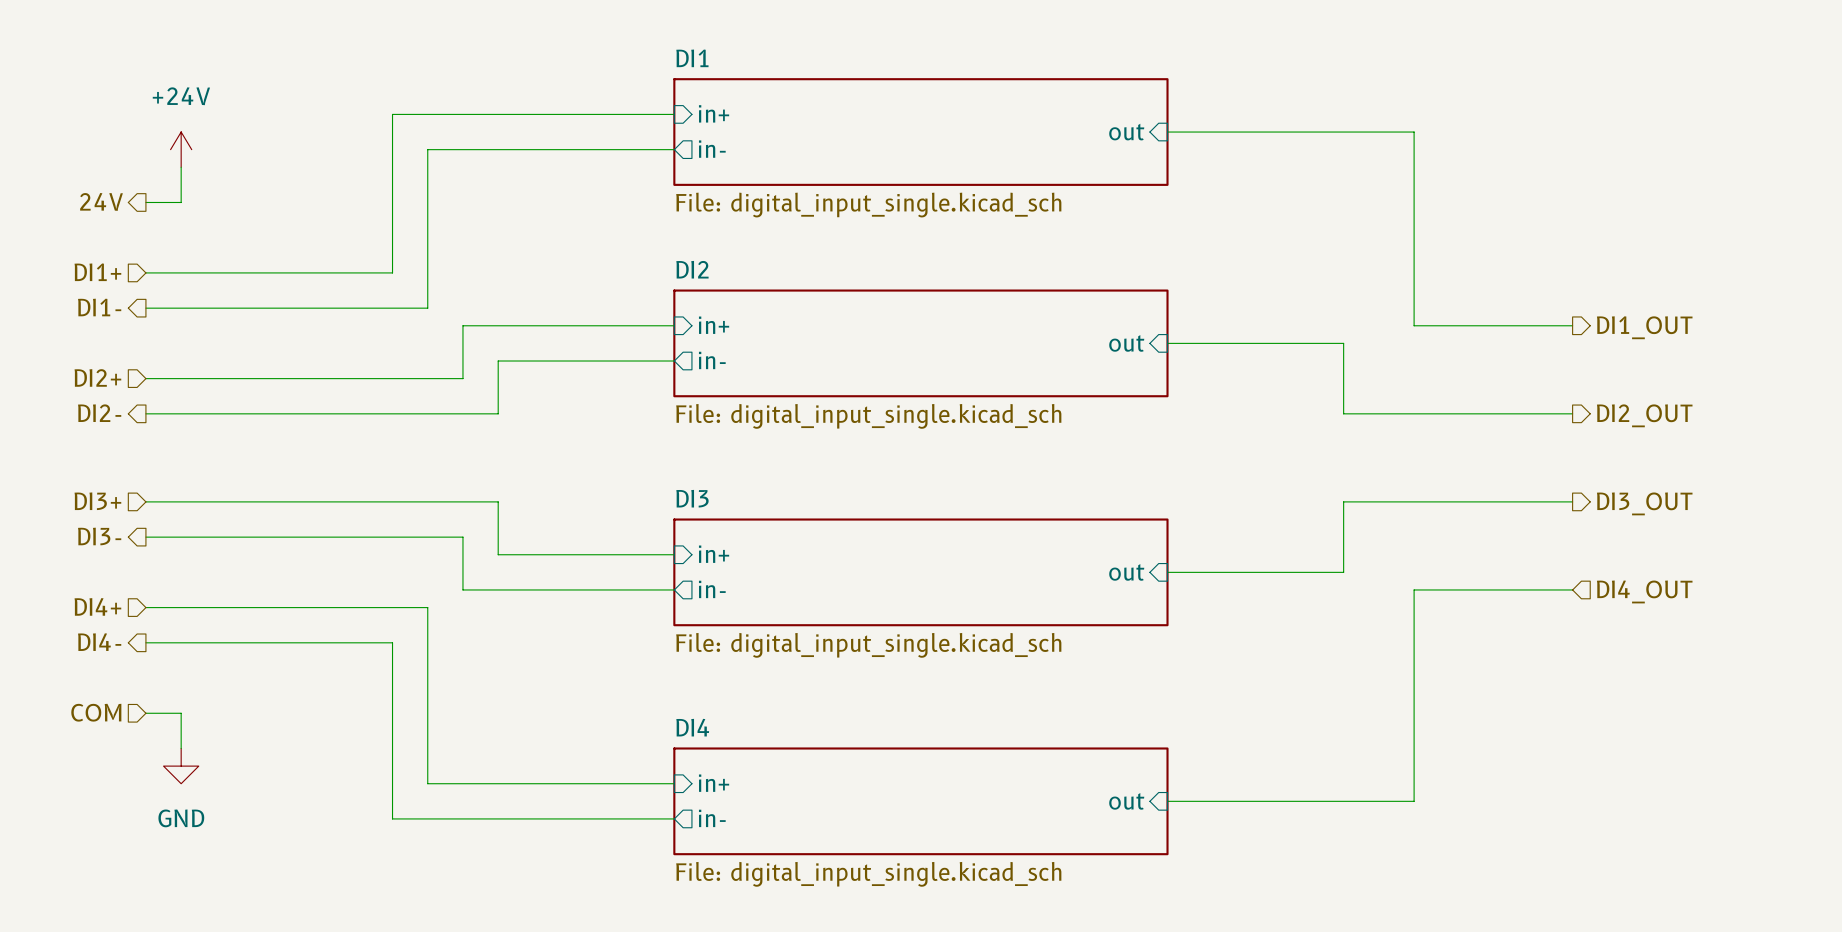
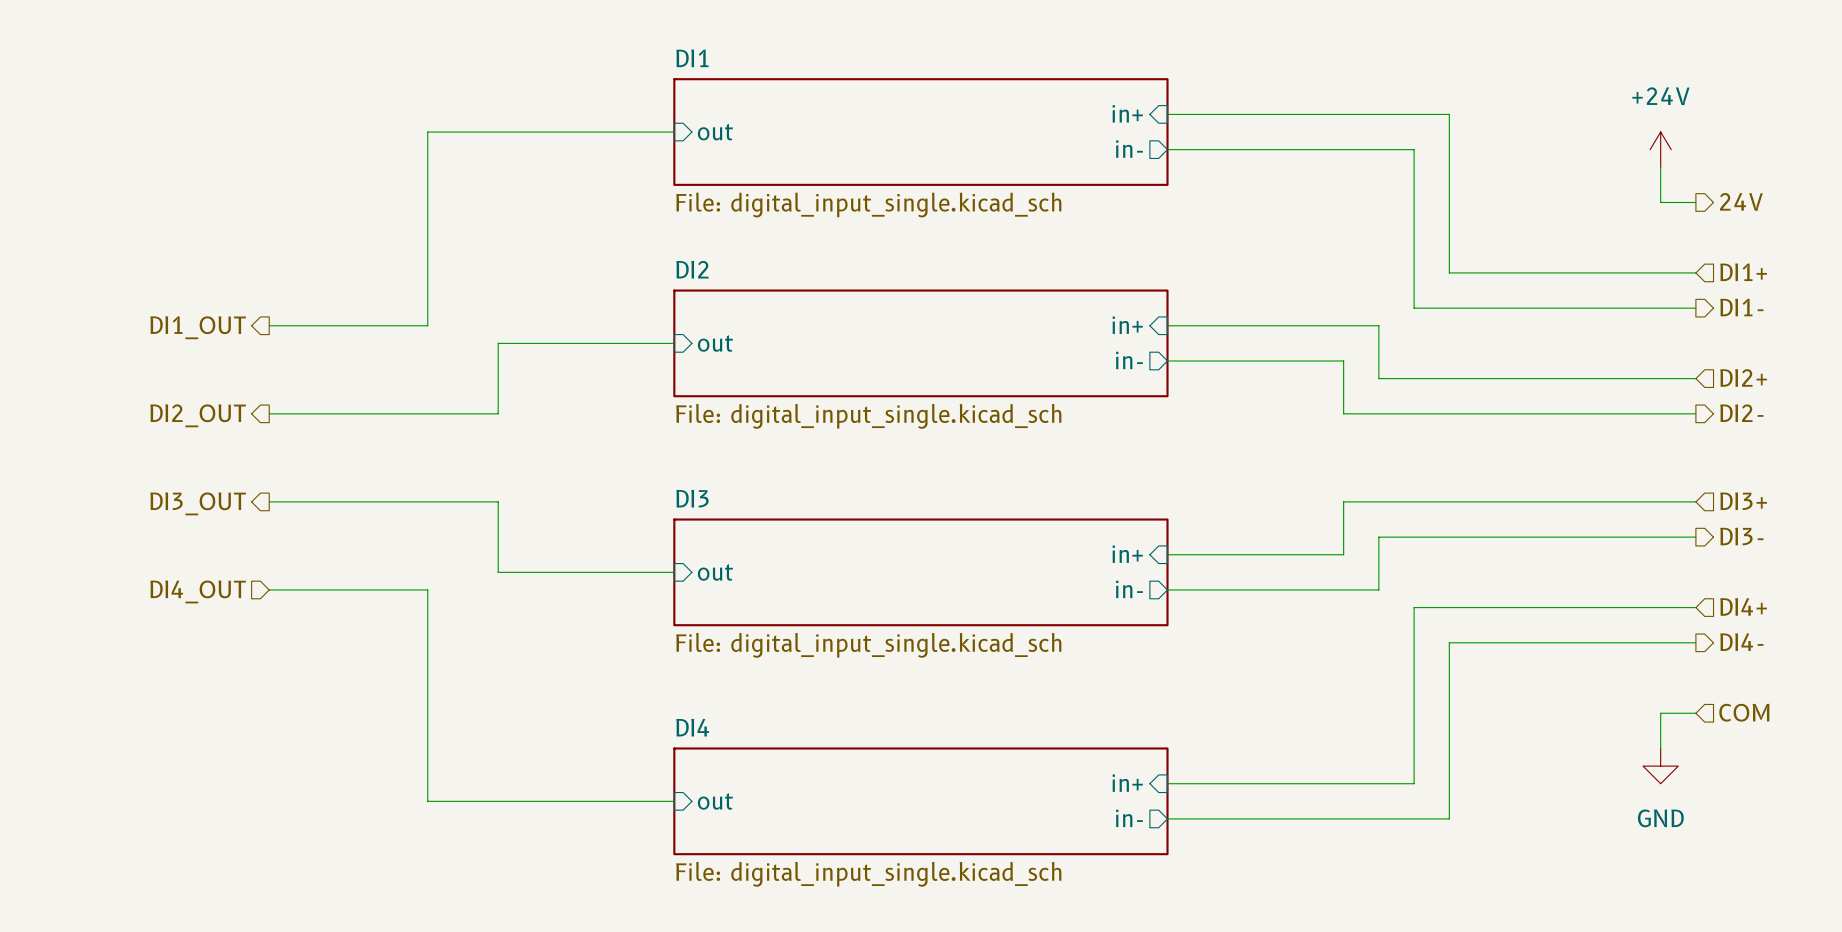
sheet pin: in+ (714, 113) -> none
sheet pin: none -> in+ (1127, 113)
wire: (674, 114) (392, 114) (392, 272) (145, 272) -> none
wire: none -> (1167, 114) (1449, 114) (1449, 272) (1695, 272)
sheet pin: none -> out (715, 132)
sheet pin: out (1126, 132) -> none
wire: (1167, 132) (1414, 132) (1414, 149) -> (1167, 149) (1414, 149)
power symbol: +24V (181, 149) -> none
wire: (427, 149) (674, 149) -> (427, 149) (427, 132) (674, 132)
sheet pin: in- (712, 149) -> none
sheet pin: none -> in- (1129, 149)
power symbol: none -> +24V (1660, 149)
wire: (181, 167) (181, 202) (145, 202) -> none
wire: none -> (1660, 167) (1660, 202) (1695, 202)
hierarchical label: 24V (101, 201) -> none
hierarchical label: none -> 24V (1741, 201)
hierarchical label: DI1+ (97, 272) -> none
hierarchical label: none -> DI1+ (1743, 272)
hierarchical label: DI1- (99, 307) -> none
hierarchical label: none -> DI1- (1741, 307)
wire: (145, 308) (427, 308) -> (269, 325) (427, 325) (427, 308)
wire: (1414, 308) (1414, 325) (1572, 325) -> (1414, 308) (1695, 308)
wire: (674, 325) (462, 325) (462, 378) (145, 378) -> none
sheet pin: in+ (714, 325) -> none
sheet pin: none -> in+ (1127, 325)
wire: none -> (1167, 325) (1378, 325) (1378, 378) (1695, 378)
hierarchical label: none -> DI1_OUT (198, 327)
hierarchical label: DI1_OUT (1644, 327) -> none
sheet pin: none -> out (715, 343)
sheet pin: out (1126, 343) -> none
wire: (1167, 343) (1343, 343) (1343, 361) -> (1167, 361) (1343, 361)
sheet pin: in- (712, 360) -> none
sheet pin: none -> in- (1129, 360)
wire: (498, 361) (674, 361) -> (498, 361) (498, 343) (674, 343)
hierarchical label: DI2+ (97, 377) -> none
hierarchical label: none -> DI2+ (1743, 377)
hierarchical label: DI2- (99, 413) -> none
wire: (145, 413) (269, 413) -> none
wire: none -> (1572, 413) (1695, 413)
hierarchical label: none -> DI2- (1741, 413)
hierarchical label: none -> DI2_OUT (198, 415)
hierarchical label: DI2_OUT (1644, 415) -> none
hierarchical label: DI3+ (97, 501) -> none
wire: (145, 501) (269, 501) -> none
wire: none -> (1572, 501) (1695, 501)
hierarchical label: none -> DI3+ (1743, 501)
hierarchical label: none -> DI3_OUT (198, 503)
hierarchical label: DI3_OUT (1644, 503) -> none
hierarchical label: DI3- (99, 536) -> none
hierarchical label: none -> DI3- (1741, 536)
wire: (145, 537) (462, 537) (462, 589) (674, 589) -> none
wire: none -> (1695, 537) (1378, 537) (1378, 589) (1167, 589)
wire: (498, 554) (674, 554) -> (498, 554) (498, 572) (674, 572)
sheet pin: in+ (714, 554) -> none
sheet pin: none -> in+ (1127, 554)
wire: (1343, 554) (1343, 572) (1167, 572) -> (1343, 554) (1167, 554)
sheet pin: none -> out (715, 572)
sheet pin: out (1126, 572) -> none
sheet pin: in- (712, 589) -> none
sheet pin: none -> in- (1129, 589)
wire: (1572, 589) (1414, 589) (1414, 607) -> (1695, 607) (1414, 607)
hierarchical label: none -> DI4_OUT (198, 591)
hierarchical label: DI4_OUT (1644, 591) -> none
hierarchical label: DI4+ (97, 606) -> none
hierarchical label: none -> DI4+ (1743, 606)
wire: (145, 607) (427, 607) -> (269, 589) (427, 589) (427, 607)
hierarchical label: DI4- (99, 642) -> none
wire: (145, 642) (392, 642) (392, 818) (674, 818) -> none
wire: none -> (1695, 642) (1449, 642) (1449, 818) (1167, 818)
hierarchical label: none -> DI4- (1741, 642)
hierarchical label: COM (96, 712) -> none
hierarchical label: none -> COM (1744, 712)
wire: (145, 713) (181, 713) (181, 748) -> none
wire: none -> (1695, 713) (1660, 713) (1660, 748)
power symbol: GND (181, 766) -> none
power symbol: none -> GND (1660, 766)
wire: (427, 783) (674, 783) -> (427, 783) (427, 801) (674, 801)
sheet pin: in+ (714, 783) -> none
sheet pin: none -> in+ (1127, 783)
wire: (1414, 783) (1414, 801) (1167, 801) -> (1414, 783) (1167, 783)
sheet pin: none -> out (715, 801)
sheet pin: out (1126, 801) -> none
sheet pin: in- (712, 818) -> none
sheet pin: none -> in- (1129, 818)

